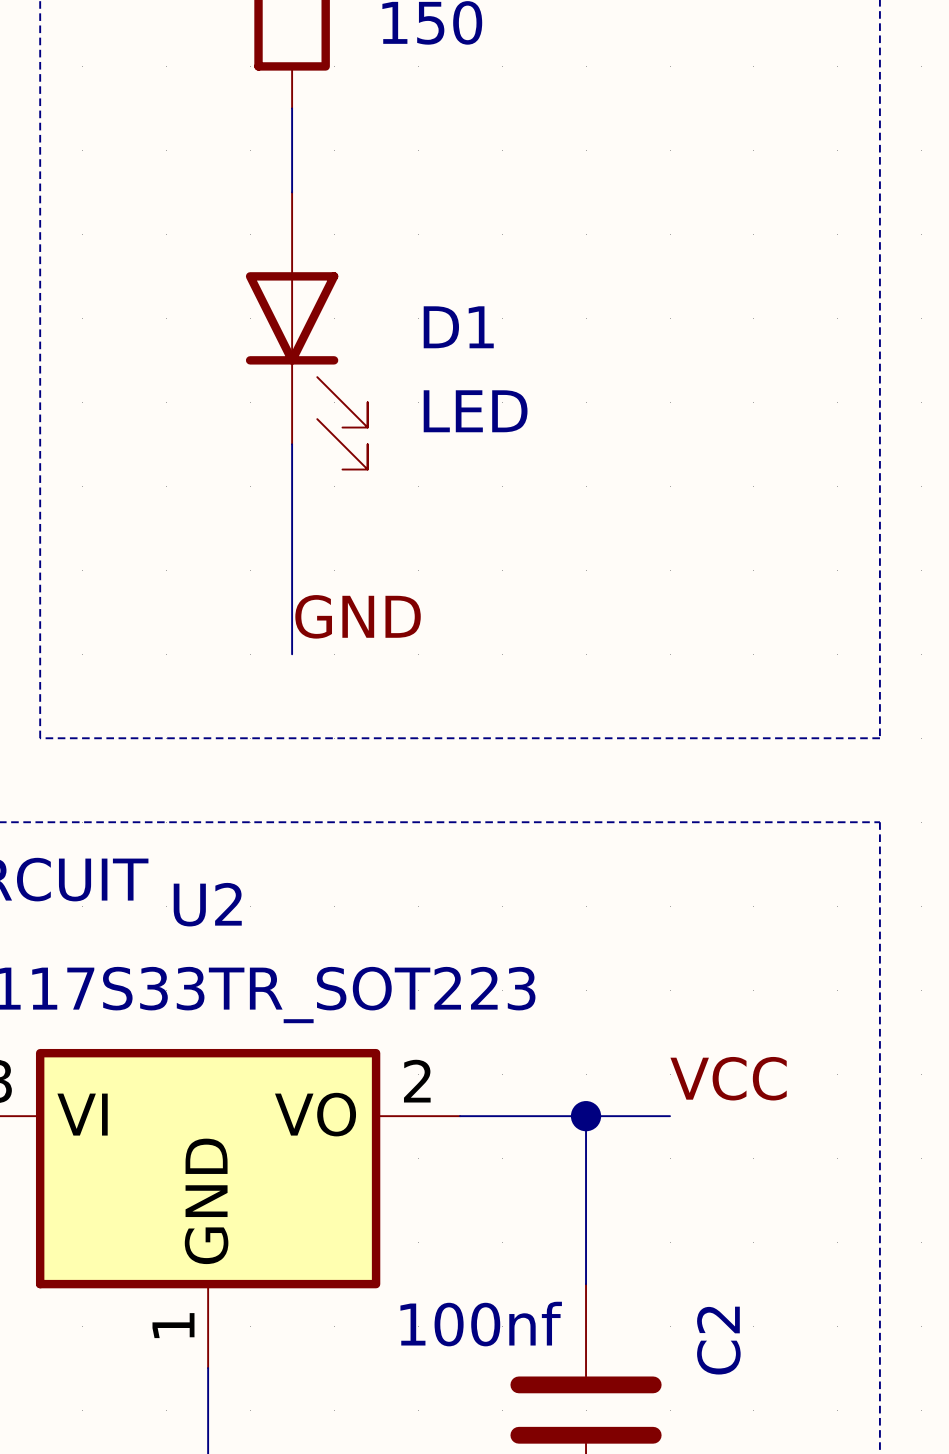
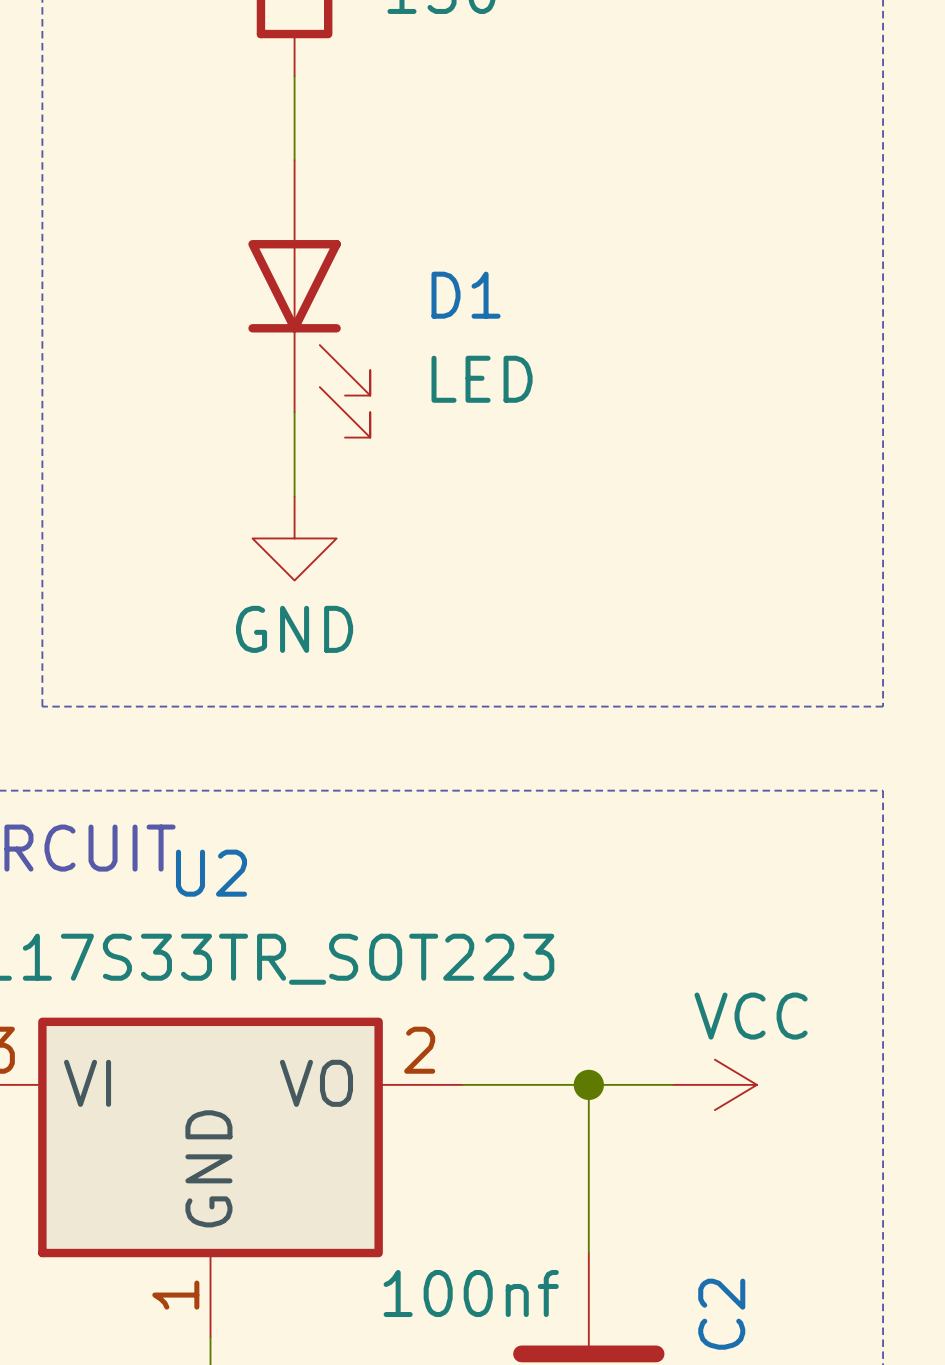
wire: (292, 528) (292, 654) -> none
power symbol: none -> GND (294, 538)
label: GND (358, 616) -> none
label: VCC (728, 1078) -> none
power symbol: none -> VCC (714, 1084)

